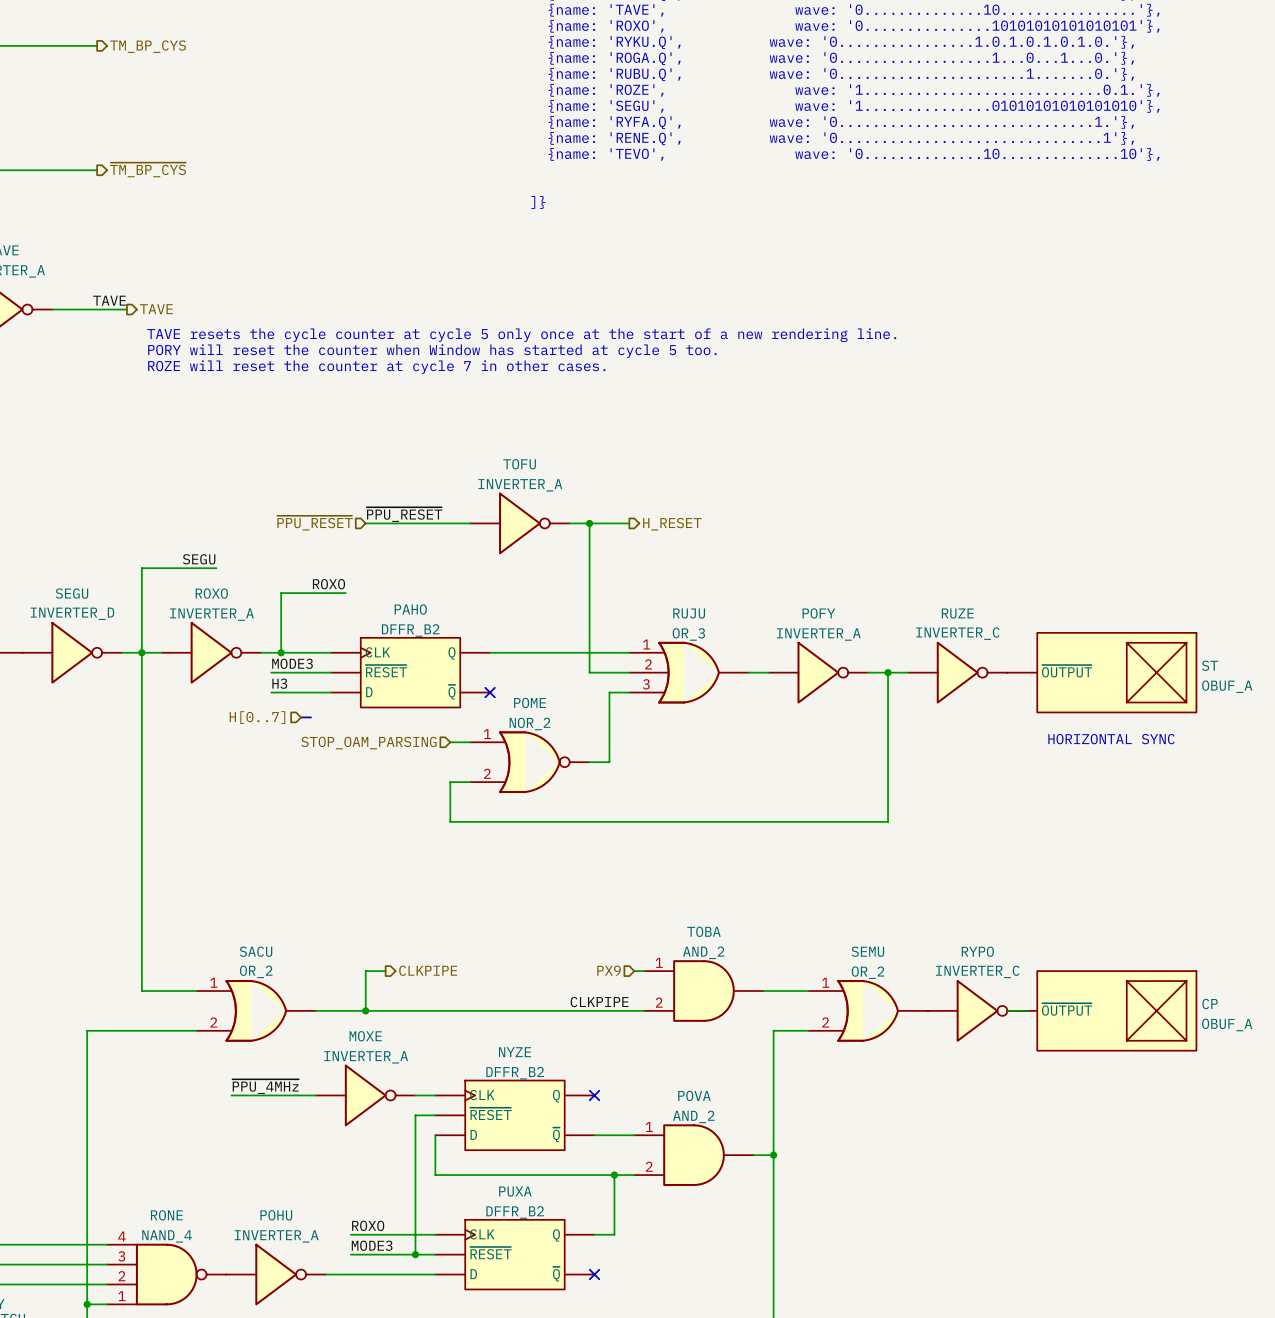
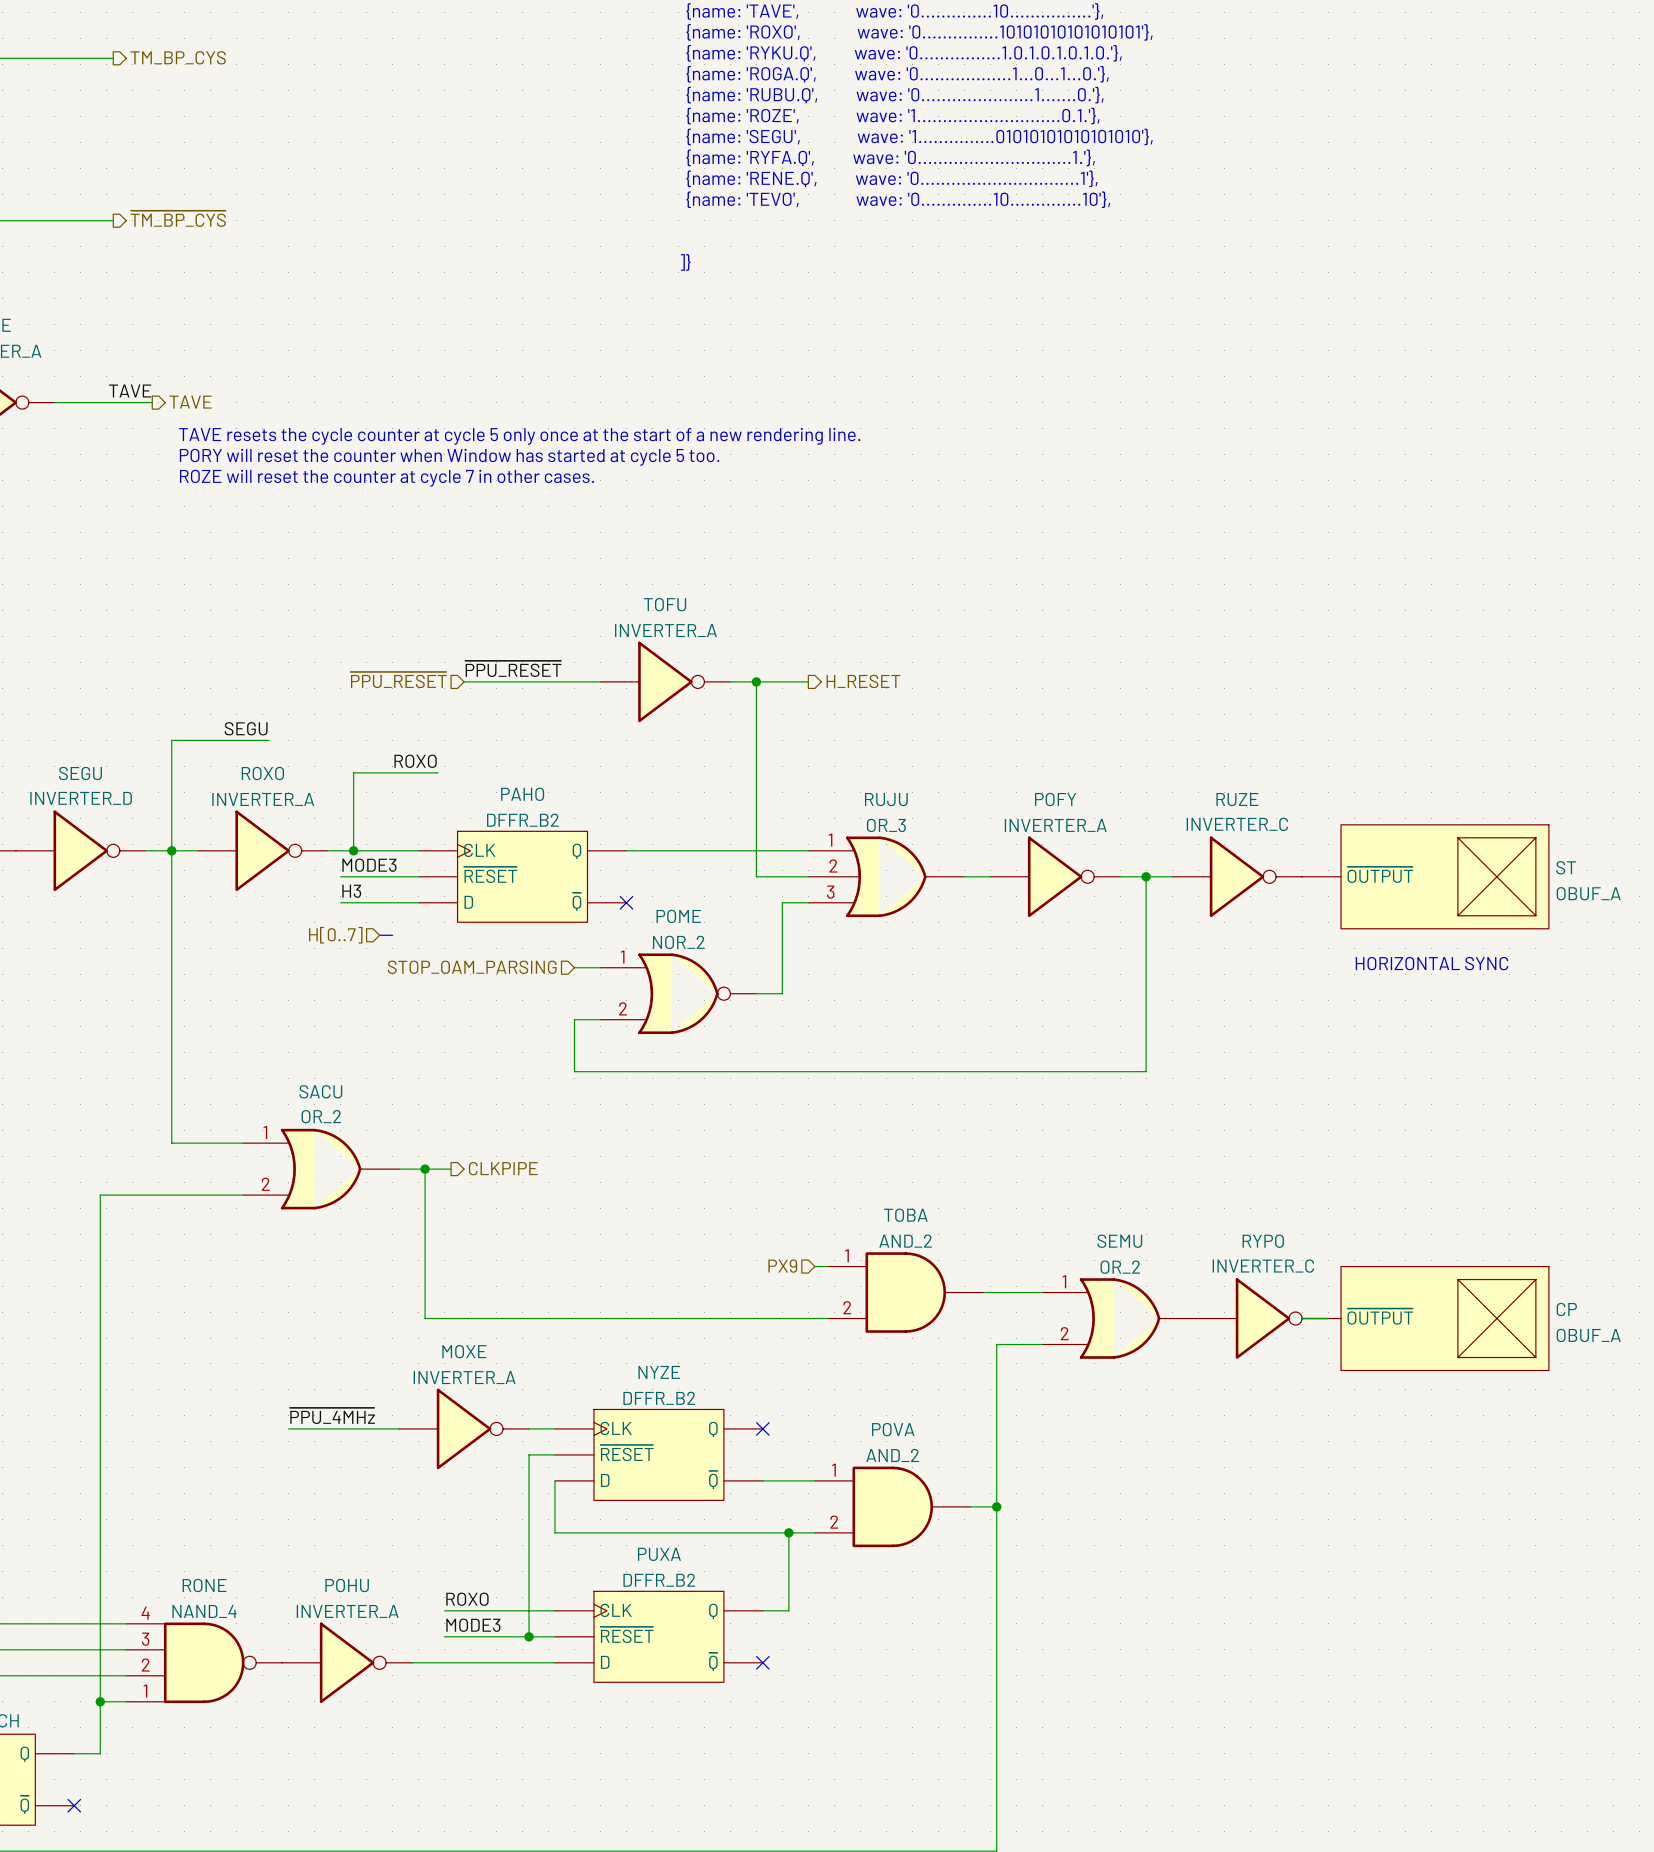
wire: (141, 876) (141, 991) (196, 991) -> (171, 1143) (243, 1143)
wire: none -> (399, 1169) (451, 1169)
junction: none -> (425, 1169)
hierarchical label position: CLKPIPE (428, 970) -> CLKPIPE (503, 1168)
wire: (385, 971) (365, 971) (365, 1010) -> none
label: CLKPIPE (599, 1002) -> none
SACU position: (256, 1010) -> (321, 1169)
wire: (315, 1010) (335, 1010) -> (425, 1169) (425, 1318)
junction: (365, 1010) -> none
wire: (87, 1030) (196, 1030) -> (100, 1344) (100, 1195) (243, 1195)

